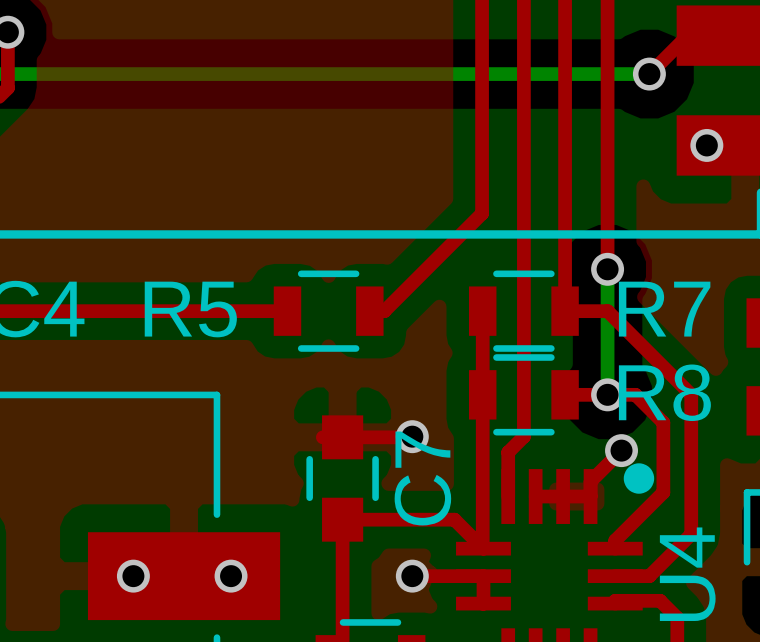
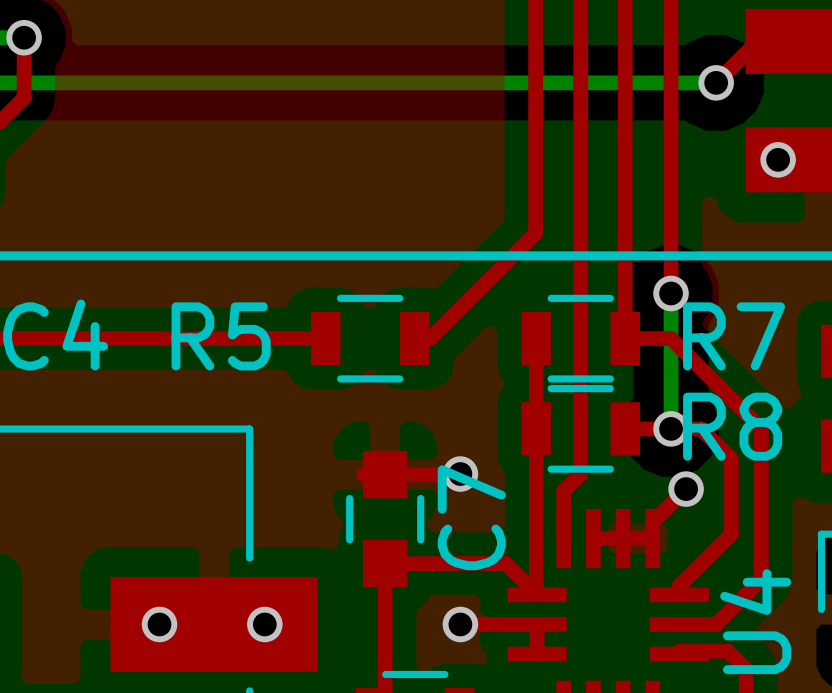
drawing: [623, 463, 655, 494] -> none

